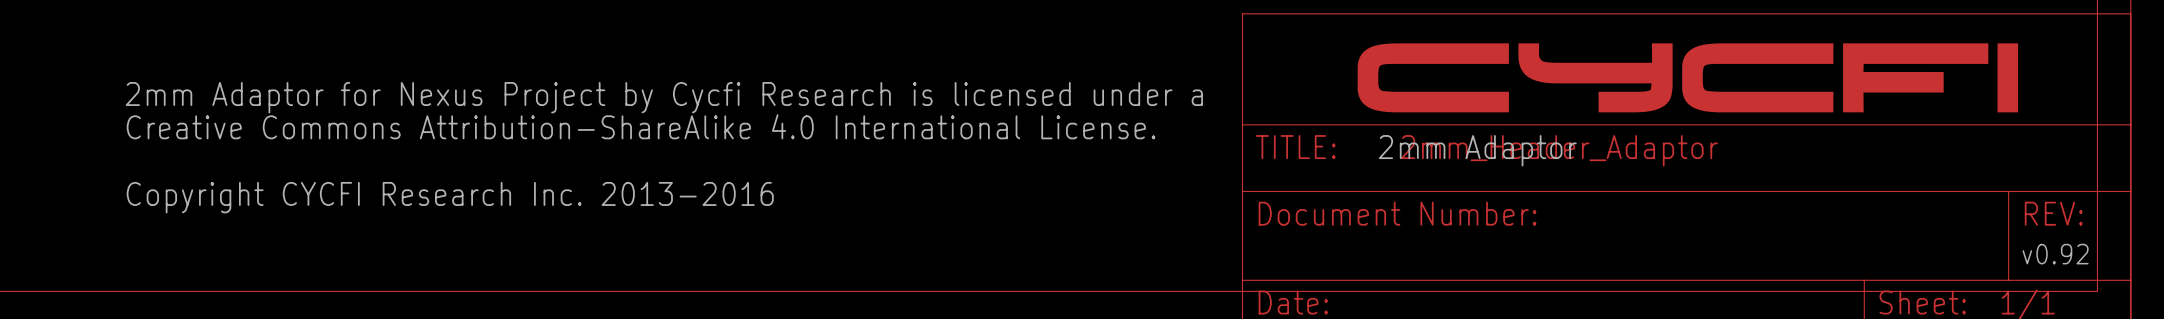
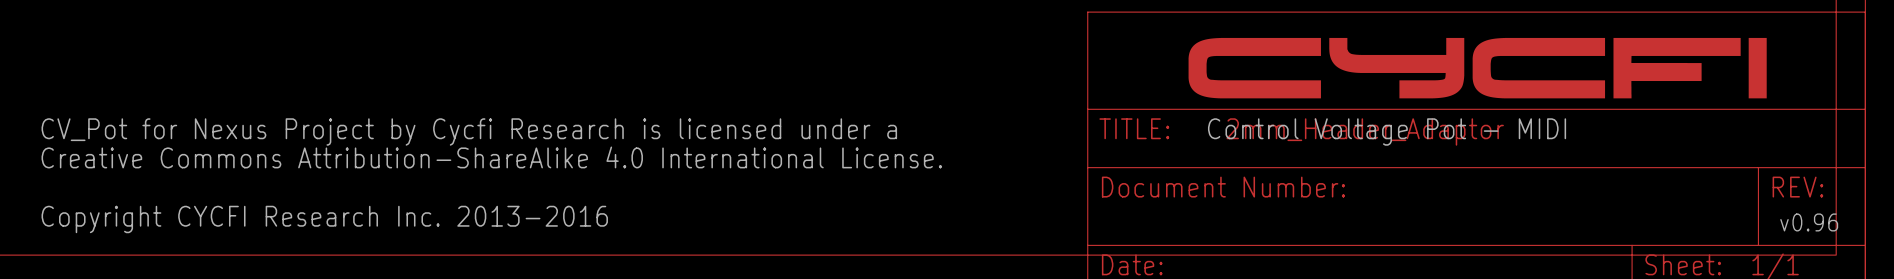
text: 2mm Adaptor for Nexus Project by Cycfi Research is licensed under a (664, 97) -> none
text position: Creative Commons Attribution-ShareAlike 4.0 International License. (641, 126) -> Creative Commons Attribution-ShareAlike 4.0 International License. (491, 157)
text: none -> CV_Pot for Nexus Project by Cycfi Research is licensed under a (469, 131)
text: 2mm Adaptor (1477, 150) -> Control Voltage Pot - MIDI (1387, 131)
text position: Copyright CYCFI Research Inc. 2013-2016 (450, 197) -> Copyright CYCFI Research Inc. 2013-2016 (324, 219)
text: v0.92 (2055, 254) -> v0.96 (1809, 222)

